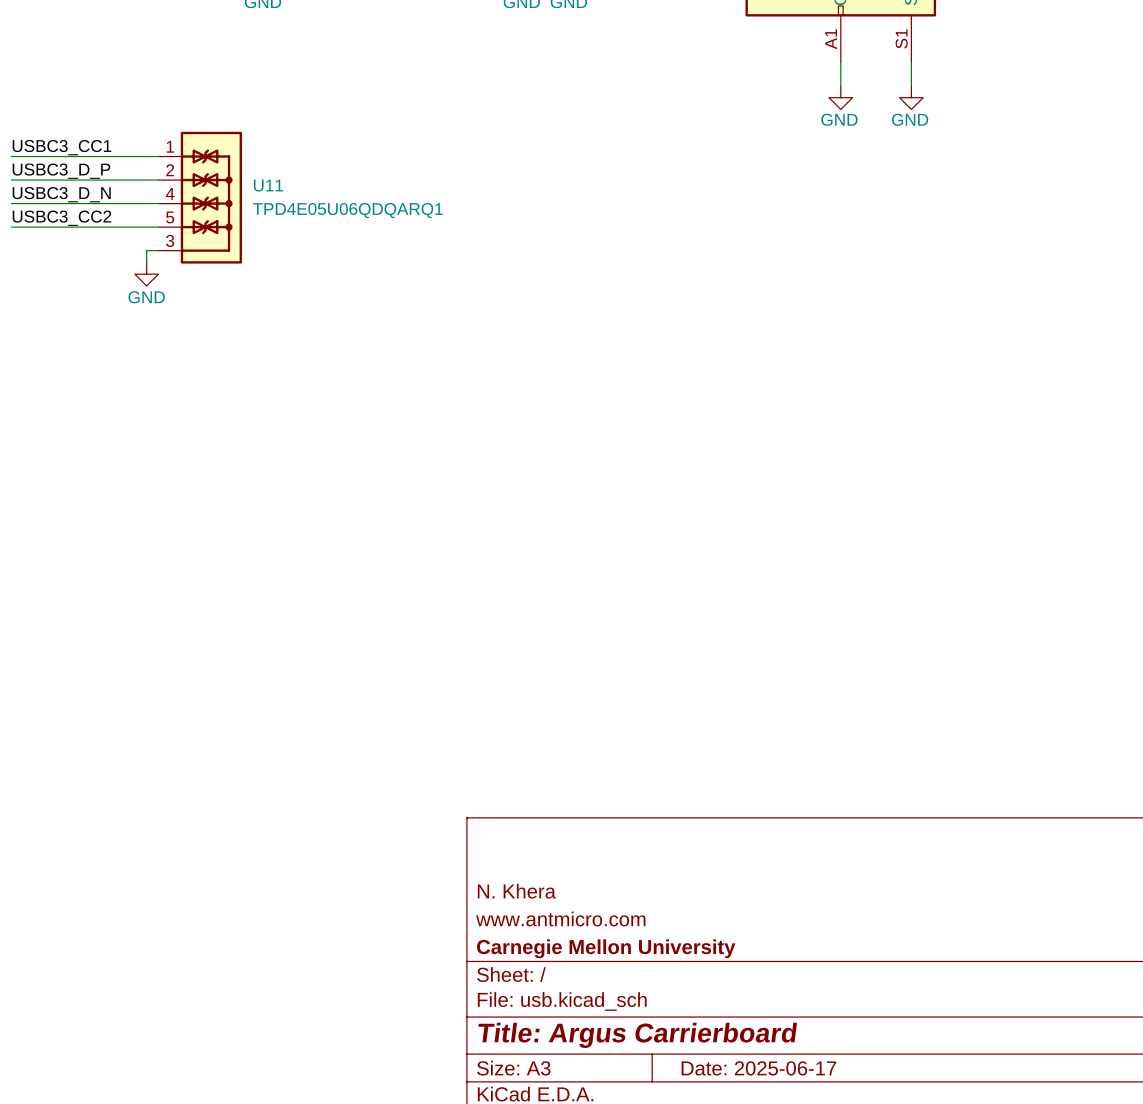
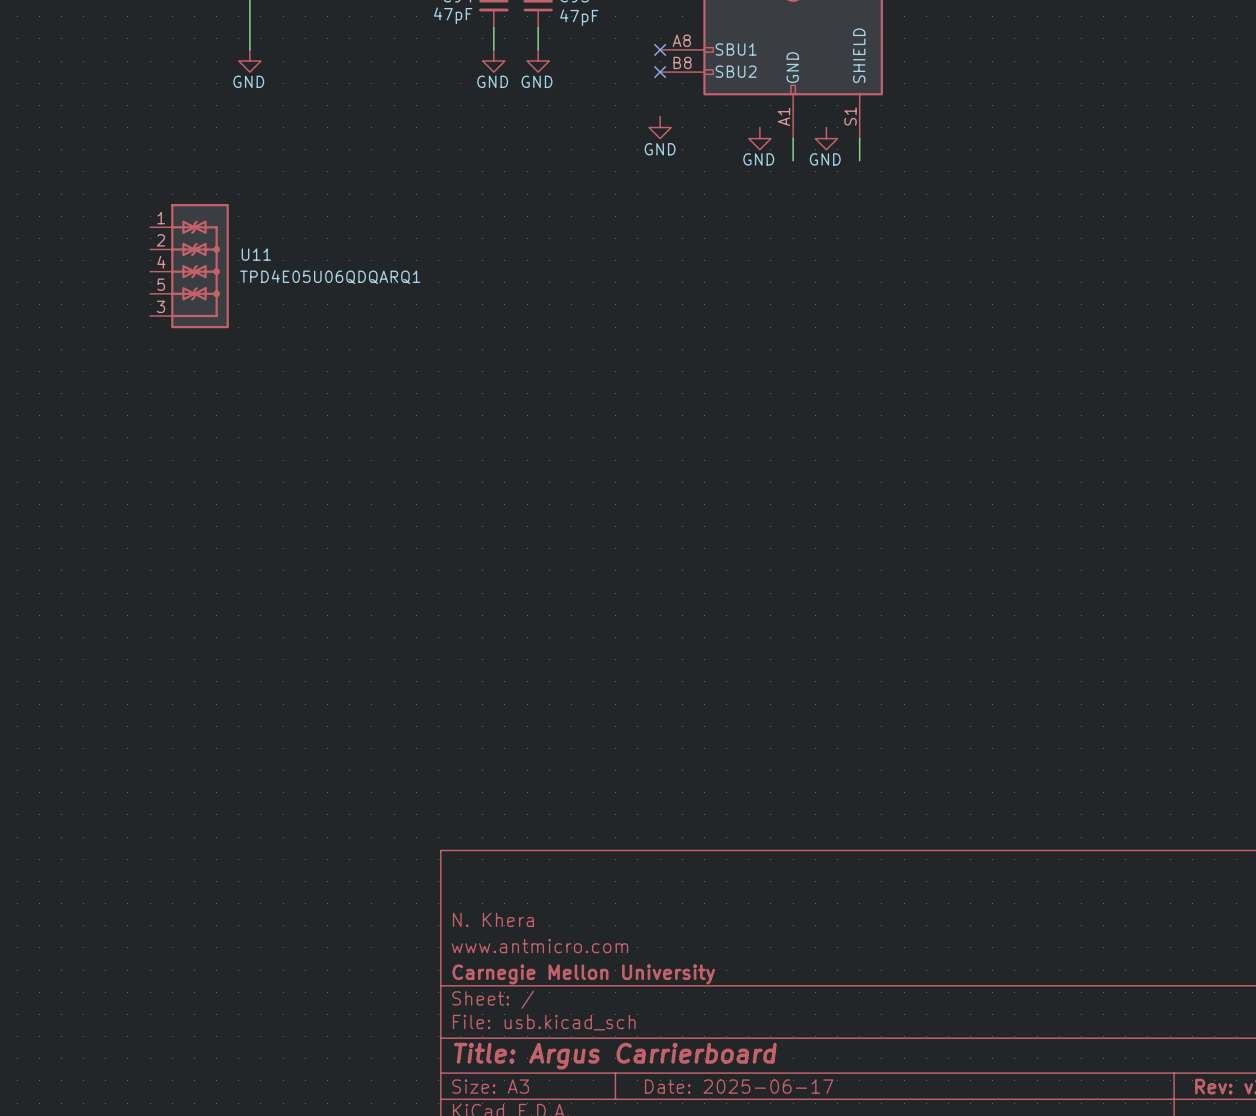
power symbol: none -> GND (660, 127)
power symbol: none -> GND (759, 138)
power symbol: none -> GND (826, 138)
power symbol: GND (840, 97) -> none
power symbol: GND (911, 97) -> none
label: USBC3_CC1 (61, 147) -> none
wire: (11, 156) (158, 156) -> none
label: USBC3_D_P (61, 171) -> none
wire: (11, 180) (158, 180) -> none
label: USBC3_D_N (61, 194) -> none
wire: (11, 203) (158, 203) -> none
label: USBC3_CC2 (61, 218) -> none
wire: (11, 227) (158, 227) -> none
wire: (158, 250) (146, 250) (146, 262) -> none
power symbol: GND (146, 274) -> none

